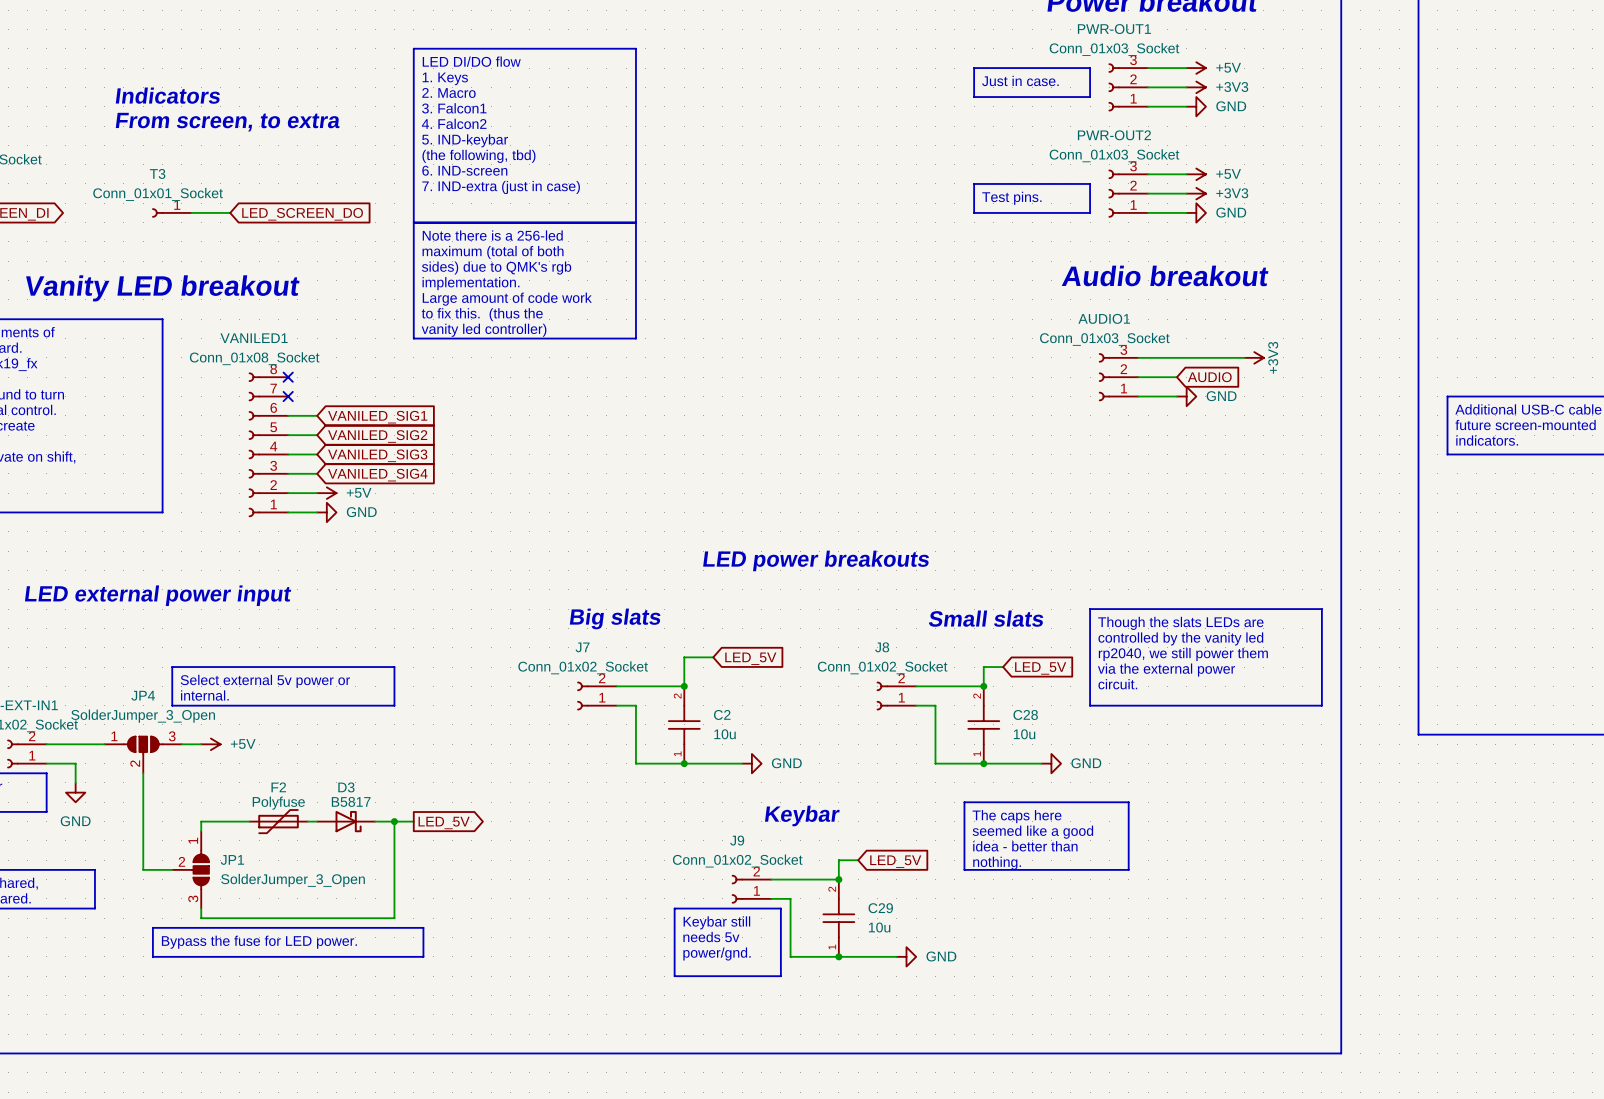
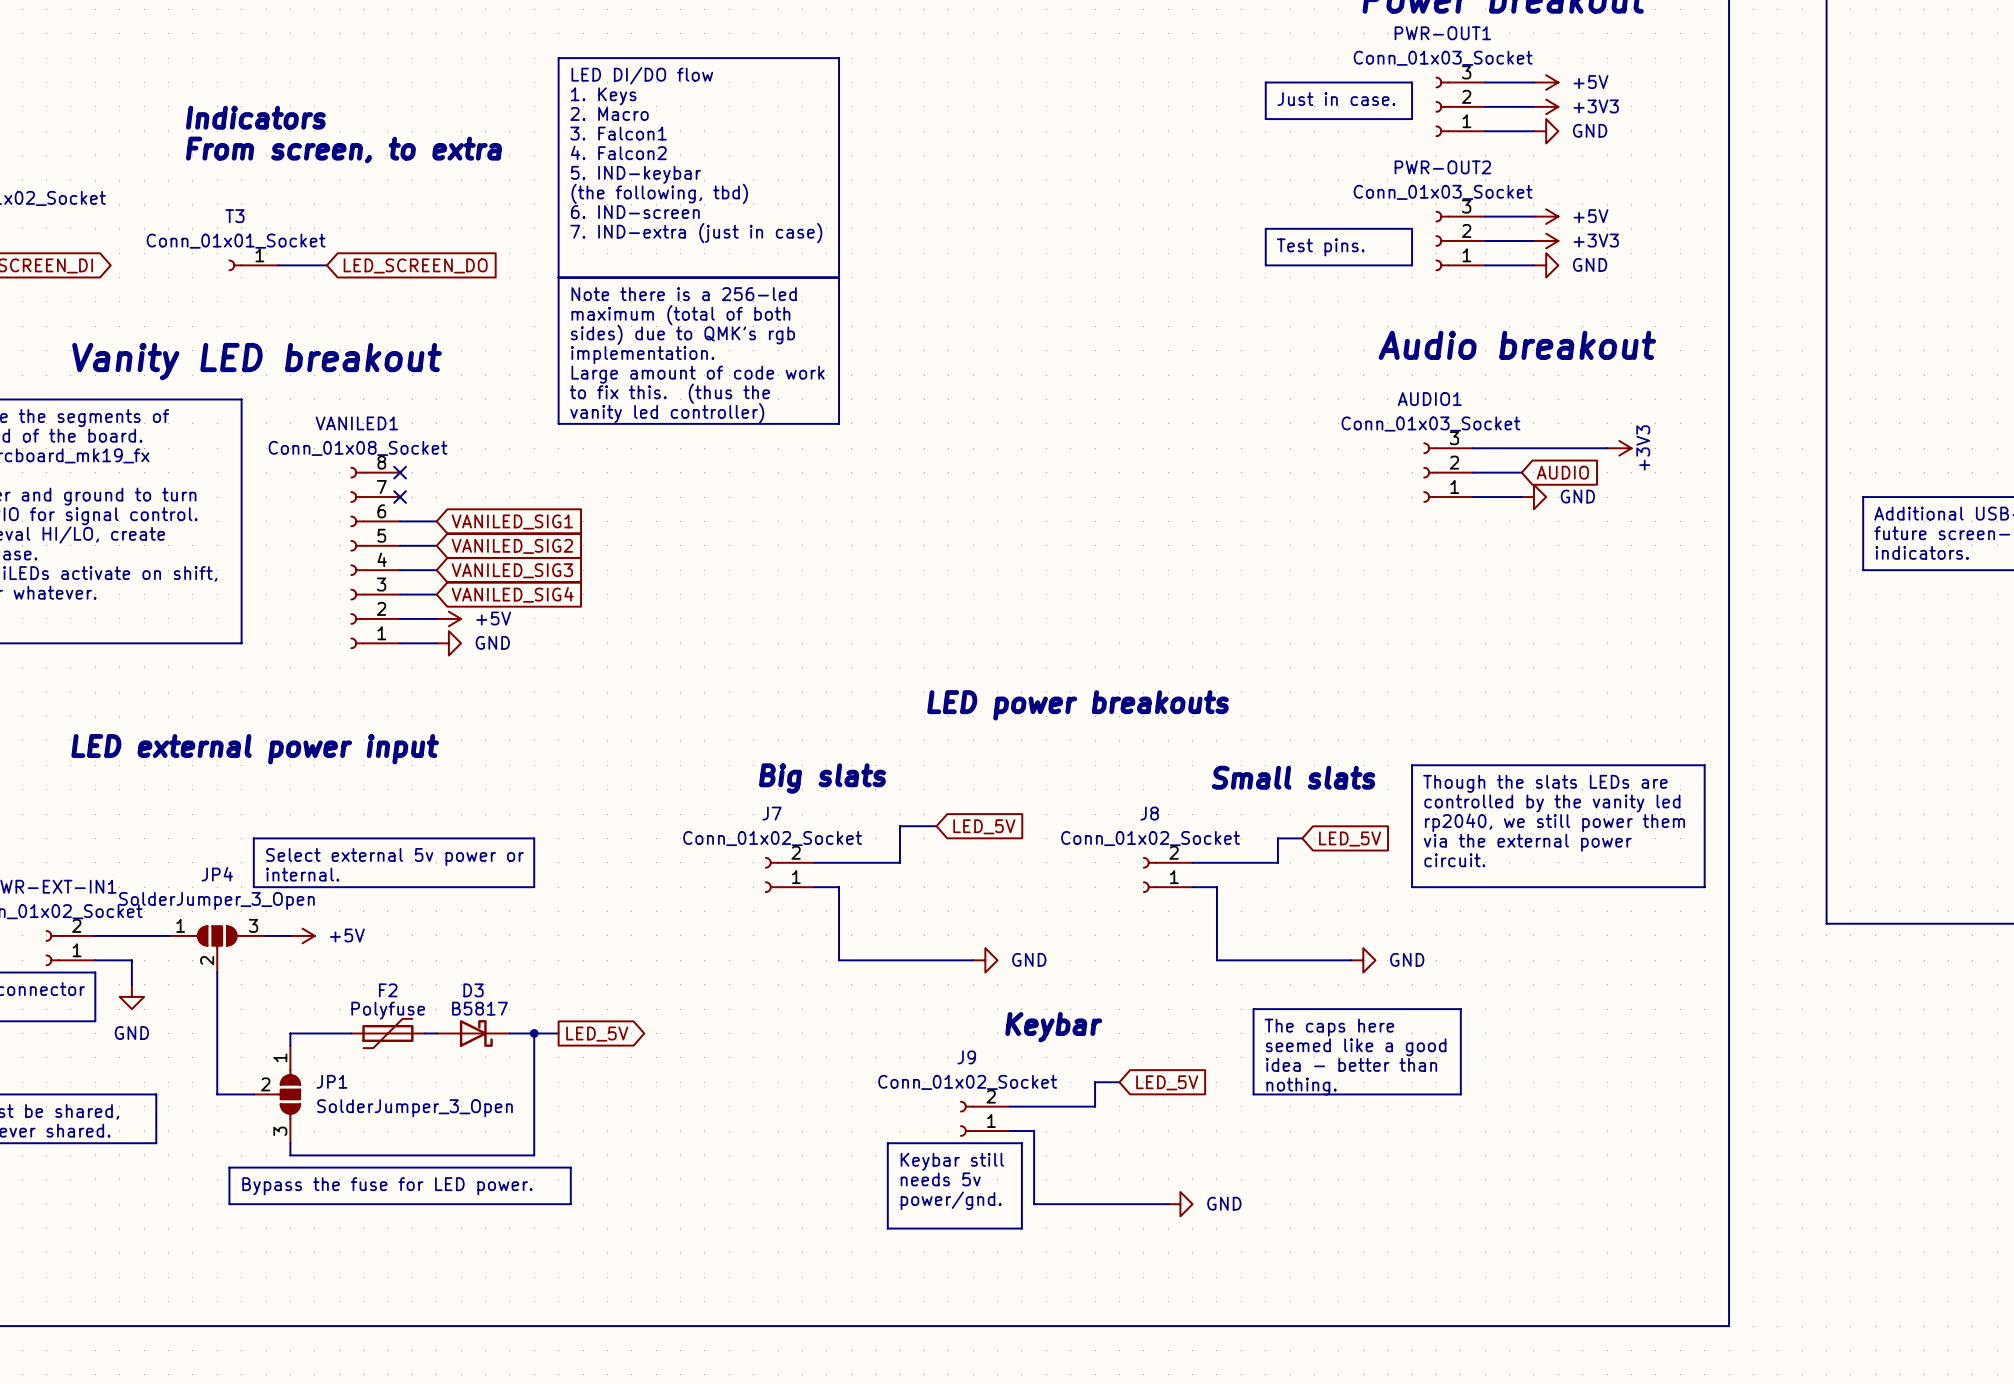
junction: (684, 686) -> none
junction: (983, 686) -> none
C2: 10u (684, 724) -> none
C28: 10u (983, 724) -> none
junction: (684, 763) -> none
junction: (983, 763) -> none
junction: (838, 879) -> none
C29: 10u (838, 918) -> none
junction: (838, 956) -> none

